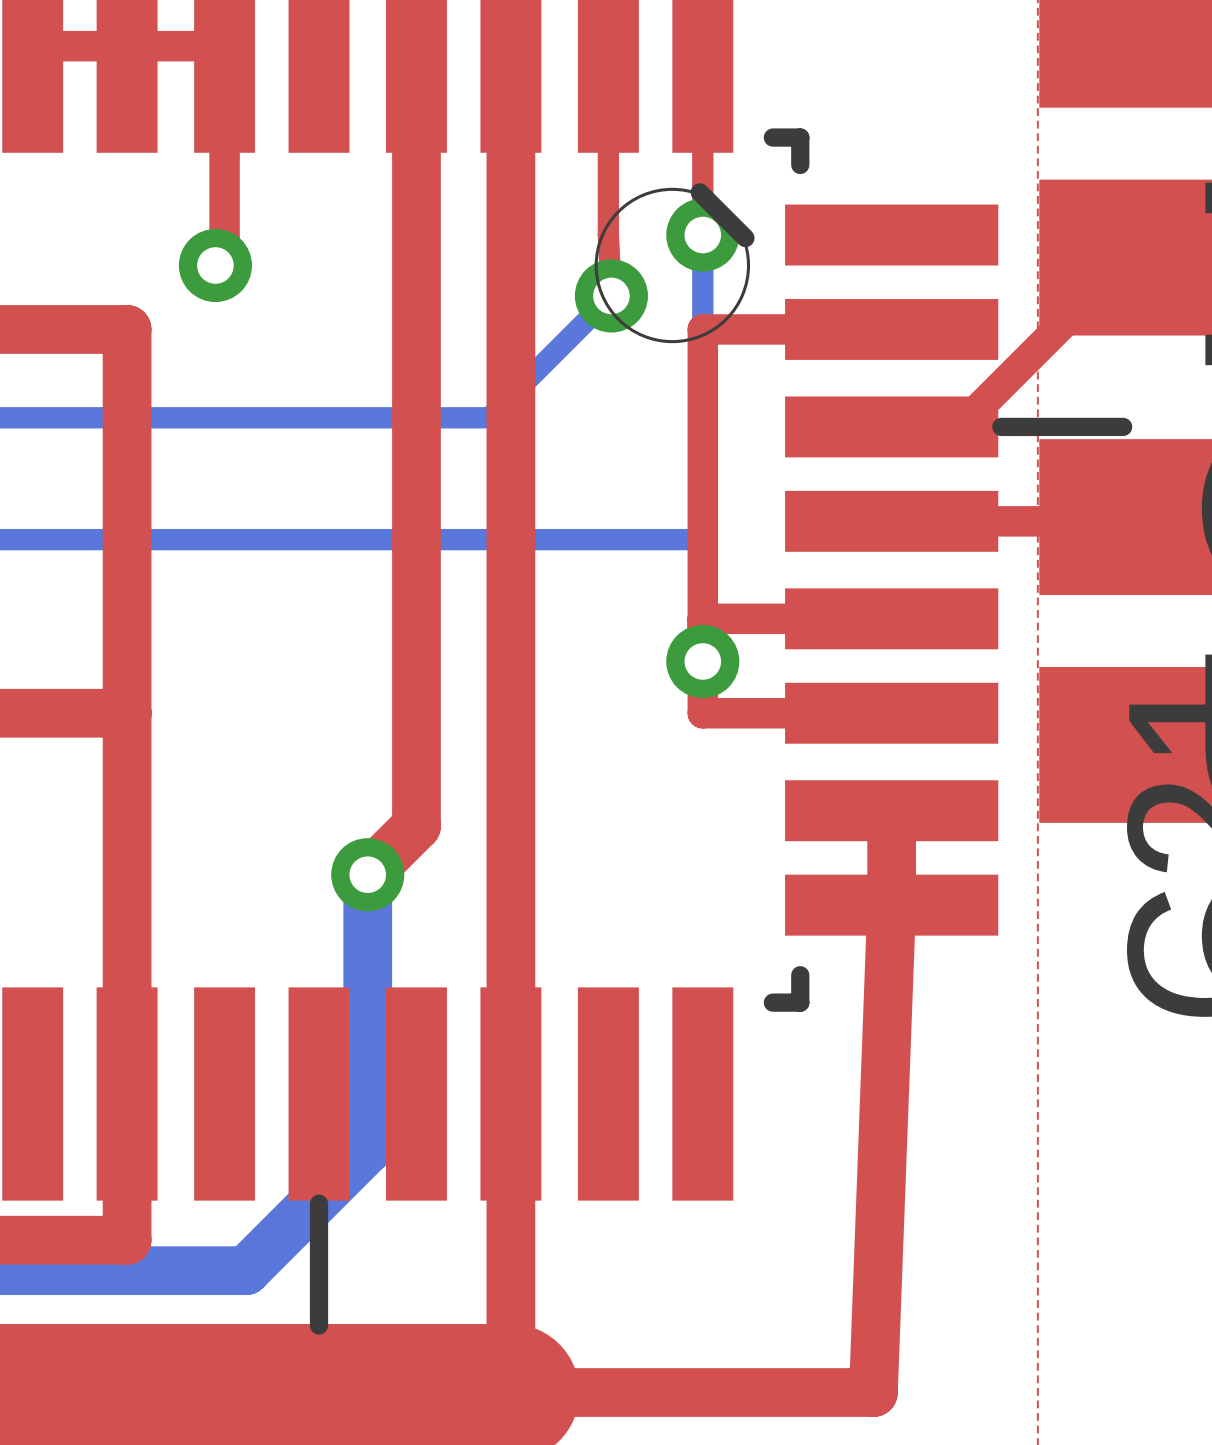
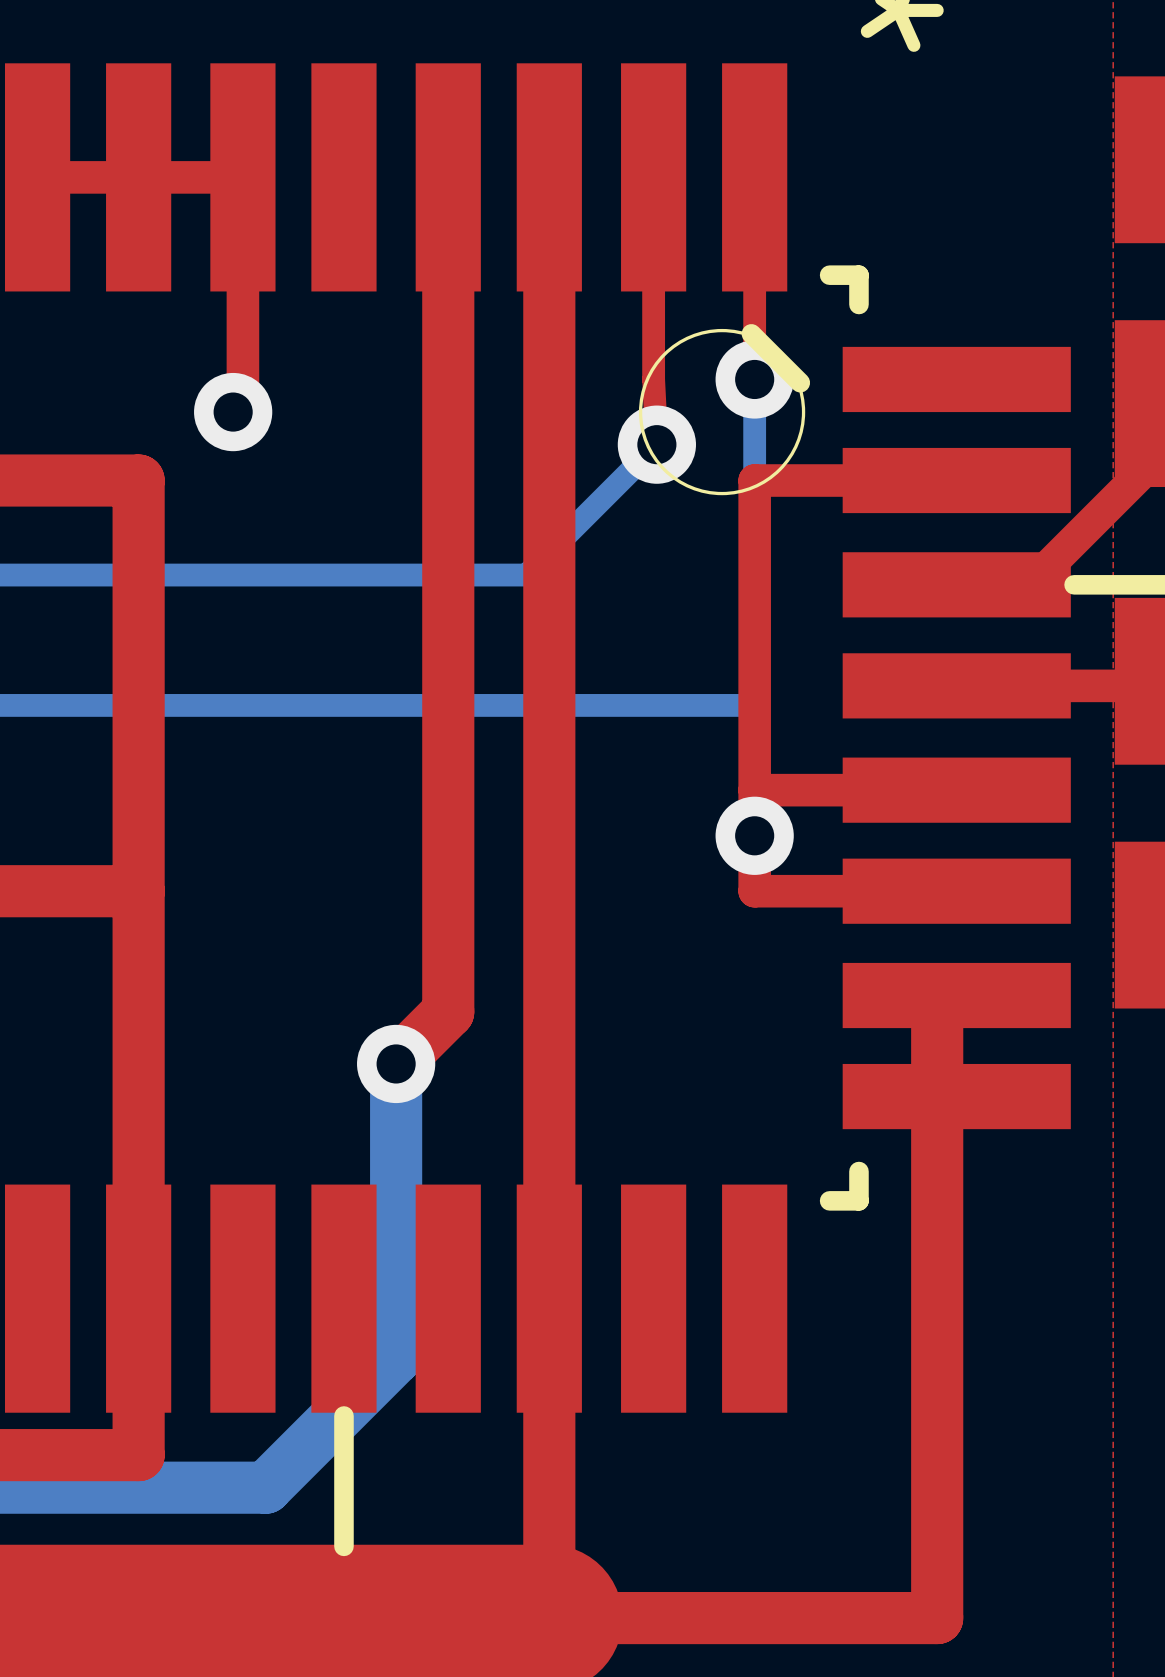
top track: (891, 810) (891, 905) (873, 1392) -> (937, 995) (937, 1618)

